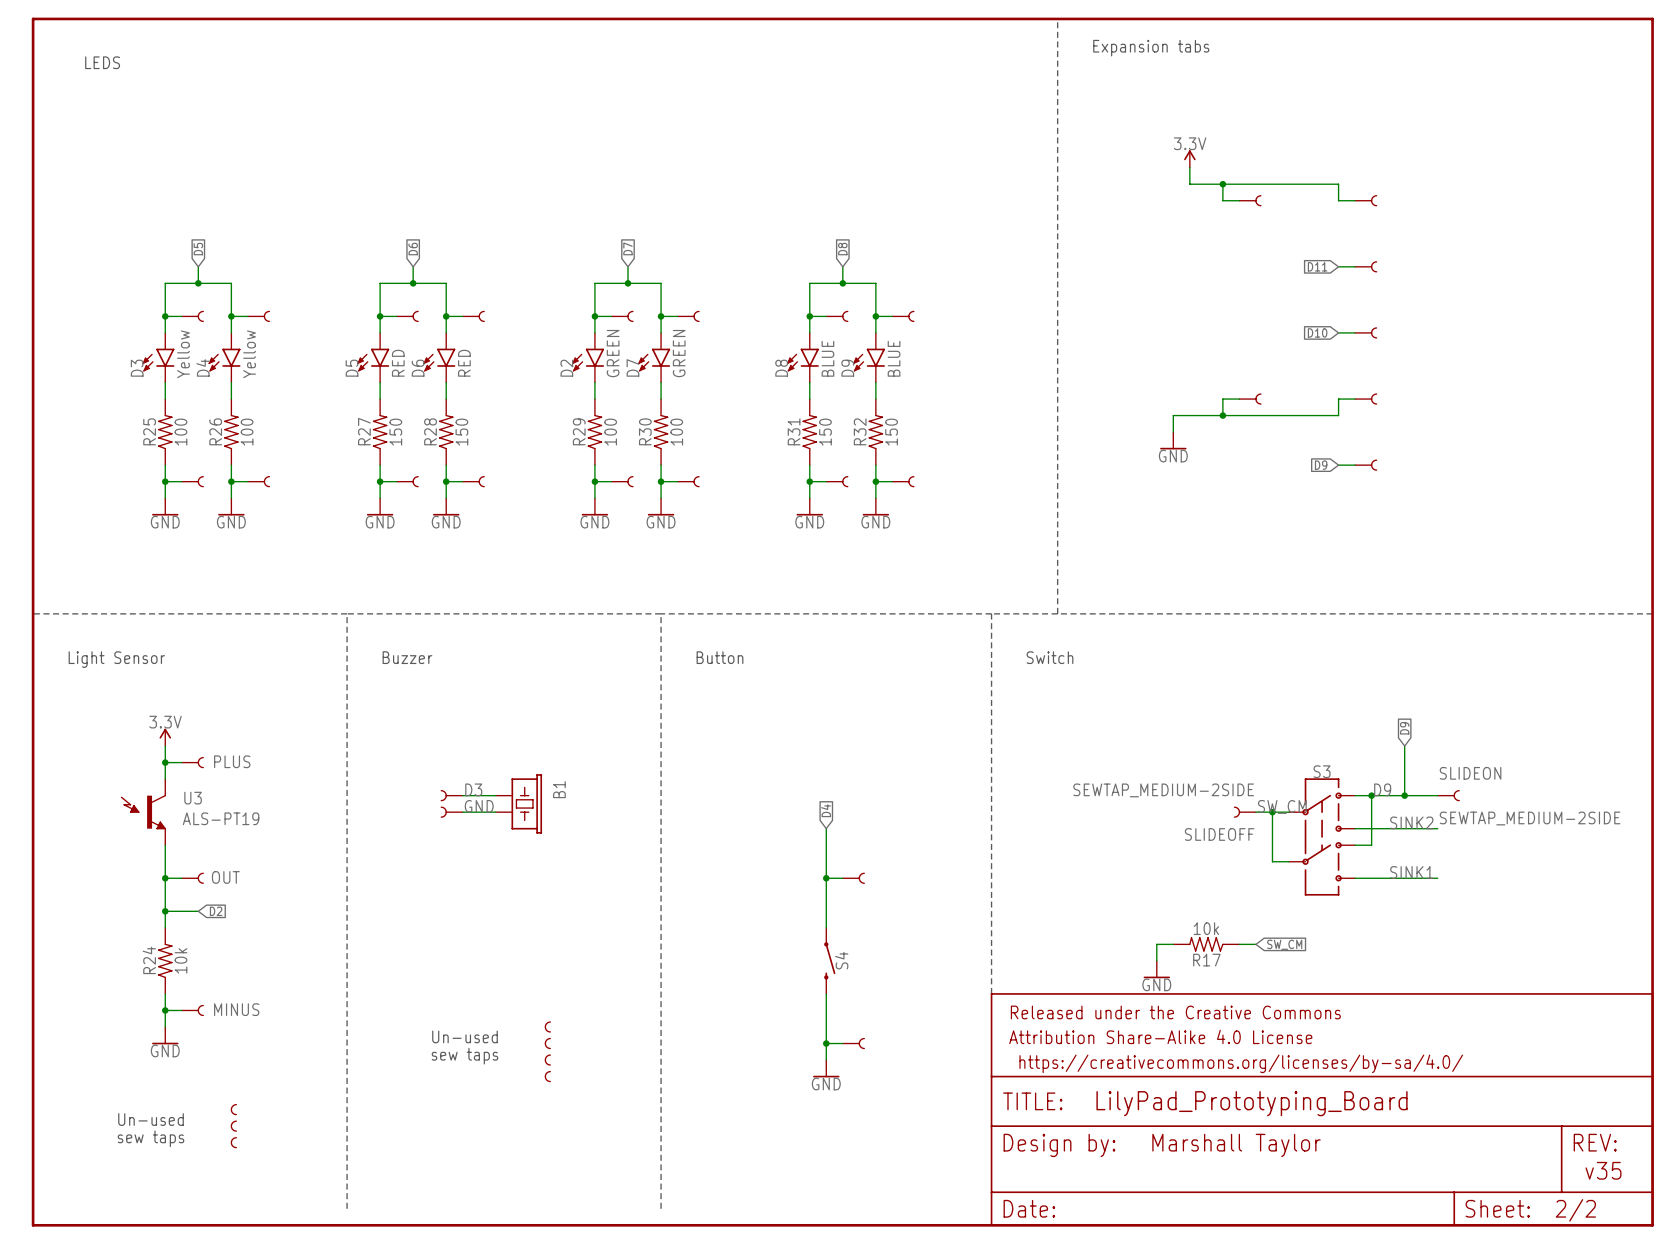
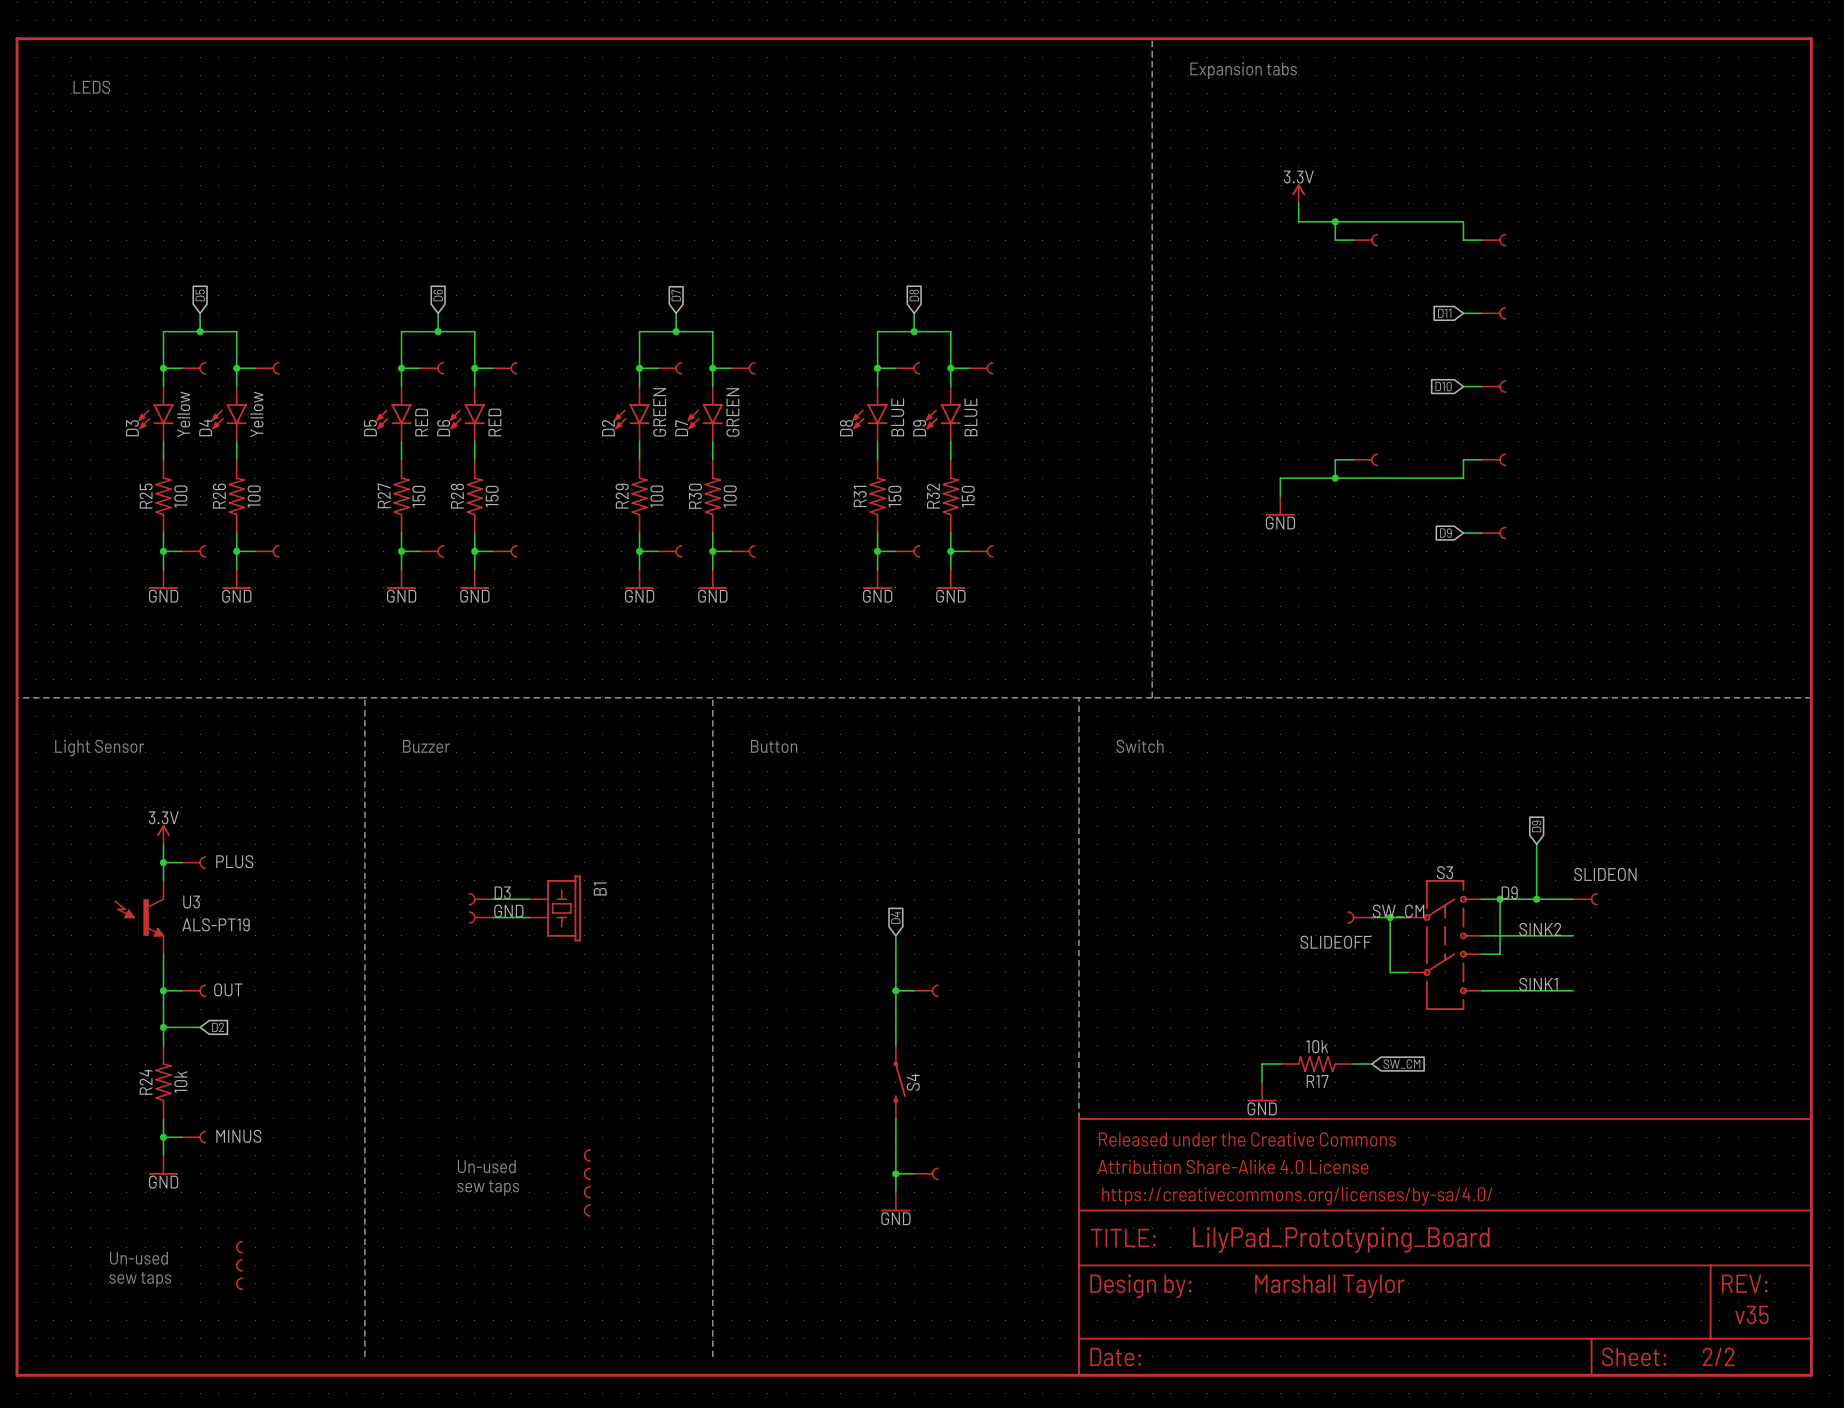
SLIDEOFF value: SEWTAP_MEDIUM-2SIDE (1163, 790) -> none
SLIDEON value: SEWTAP_MEDIUM-2SIDE (1530, 818) -> none

